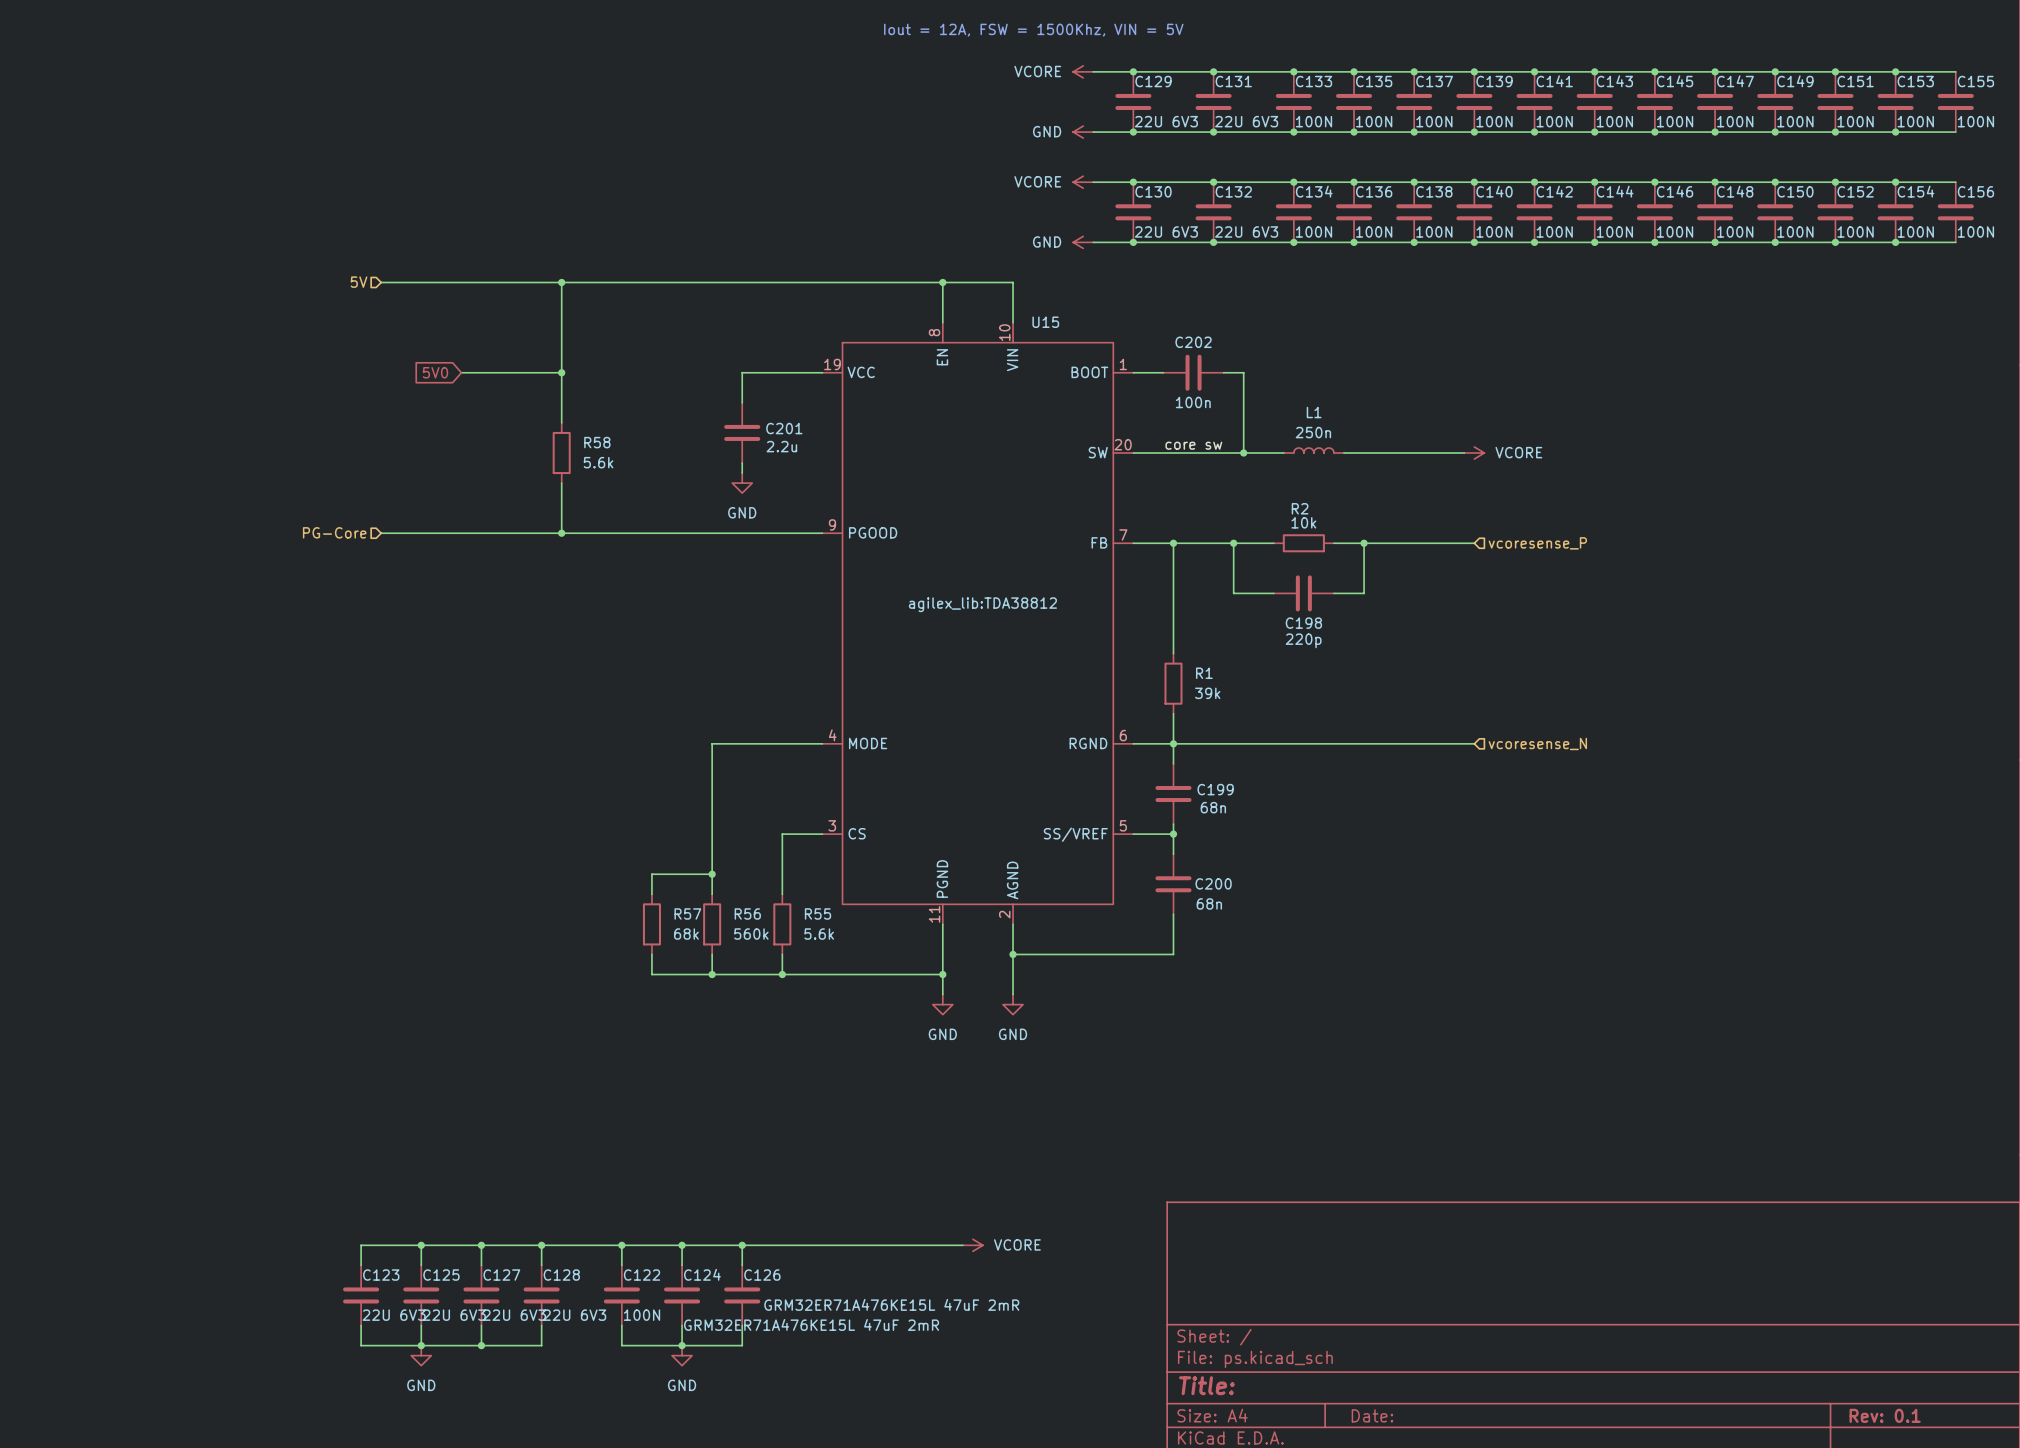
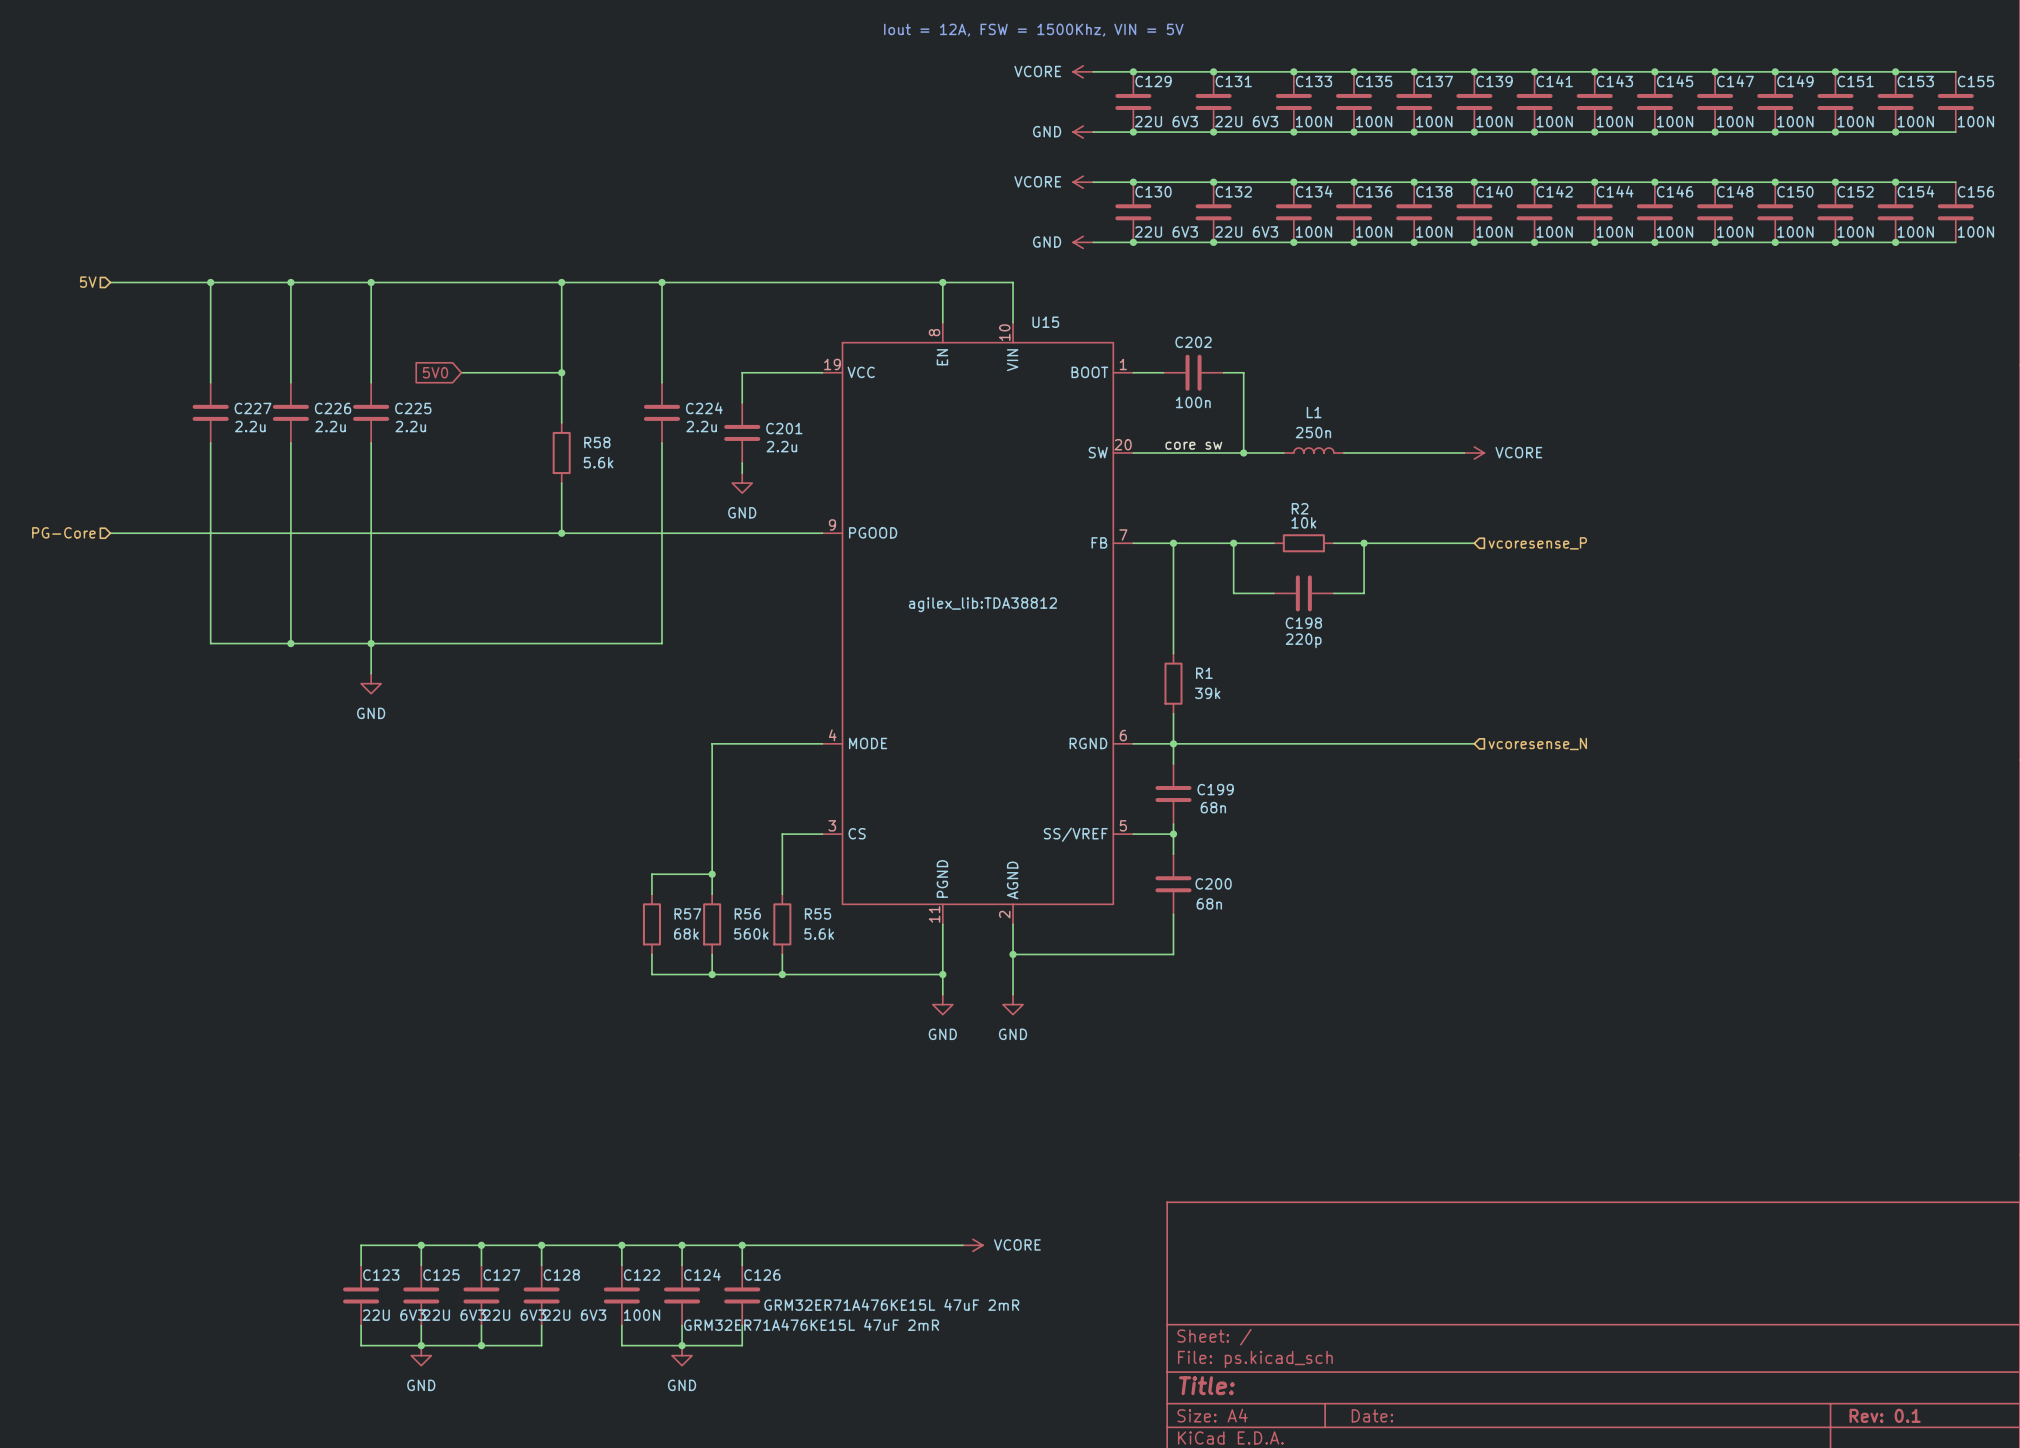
hierarchical label: none -> 5V (88, 282)
wire: none -> (110, 282) (381, 282)
wire: none -> (210, 282) (210, 382)
junction: none -> (210, 282)
wire: none -> (290, 282) (290, 382)
junction: none -> (290, 282)
hierarchical label: 5V (359, 282) -> none
wire: none -> (371, 282) (371, 382)
junction: none -> (371, 282)
wire: none -> (661, 282) (661, 382)
junction: none -> (661, 282)
C227: none -> 2.2u (210, 412)
C226: none -> 2.2u (290, 412)
C225: none -> 2.2u (371, 412)
C224: none -> 2.2u (661, 412)
wire: none -> (210, 442) (210, 643) (661, 643) (661, 442)
wire: none -> (290, 442) (290, 643)
wire: none -> (371, 442) (371, 673)
hierarchical label: none -> PG-Core (63, 532)
hierarchical label: PG-Core (334, 532) -> none
wire: none -> (110, 533) (381, 533)
junction: none -> (290, 643)
junction: none -> (371, 643)
power symbol: none -> GND (371, 683)

